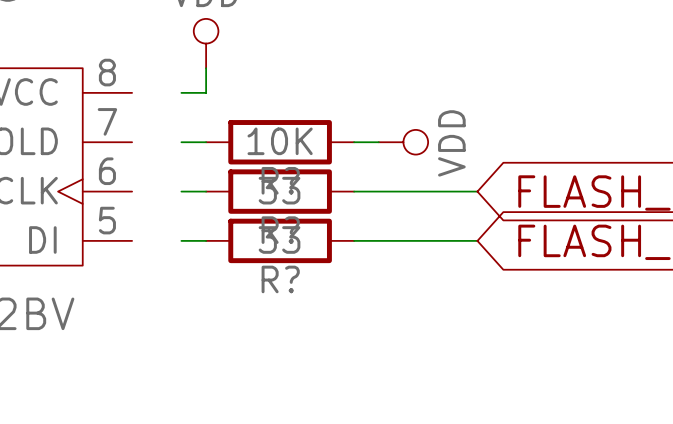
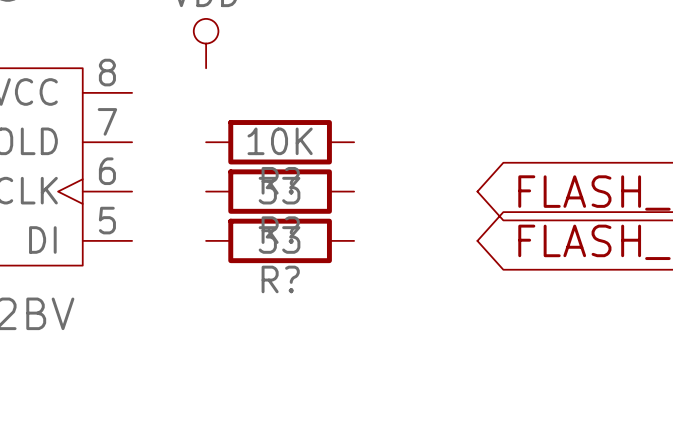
wire: (206, 68) (206, 92) (181, 92) -> none
wire: (181, 142) (206, 142) -> none
wire: (354, 142) (378, 142) -> none
power symbol: VDD (403, 142) -> none
wire: (181, 191) (206, 191) -> none
wire: (354, 191) (477, 191) -> none
wire: (181, 240) (206, 240) -> none
wire: (354, 240) (477, 240) -> none

